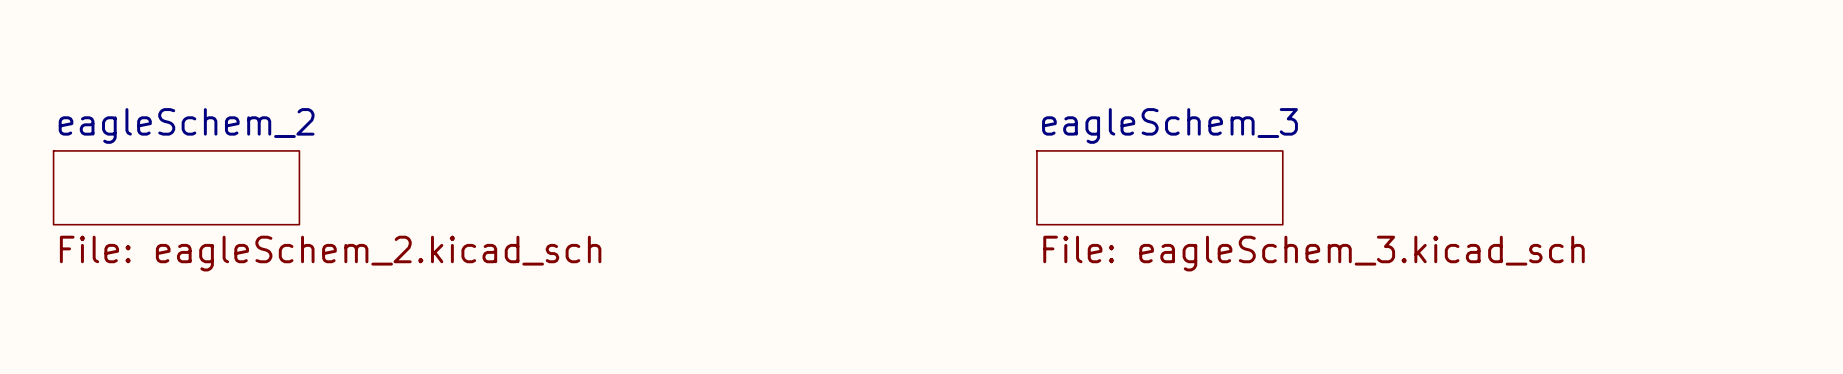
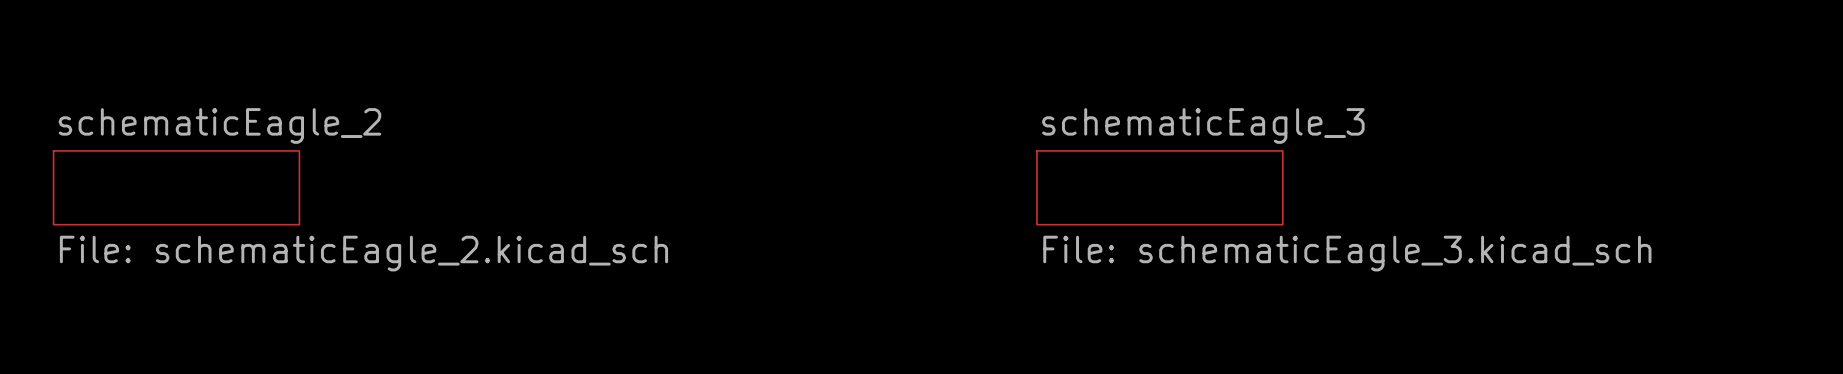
sheet eagleSchem_2 name: eagleSchem_2 (186, 125) -> schematicEagle_2 (219, 125)
sheet eagleSchem_3 name: eagleSchem_3 (1170, 125) -> schematicEagle_3 (1203, 125)
sheet eagleSchem_2 value: File: eagleSchem_2.kicad_sch (330, 253) -> File: schematicEagle_2.kicad_sch (363, 253)
sheet eagleSchem_3 value: File: eagleSchem_3.kicad_sch (1314, 253) -> File: schematicEagle_3.kicad_sch (1347, 253)

